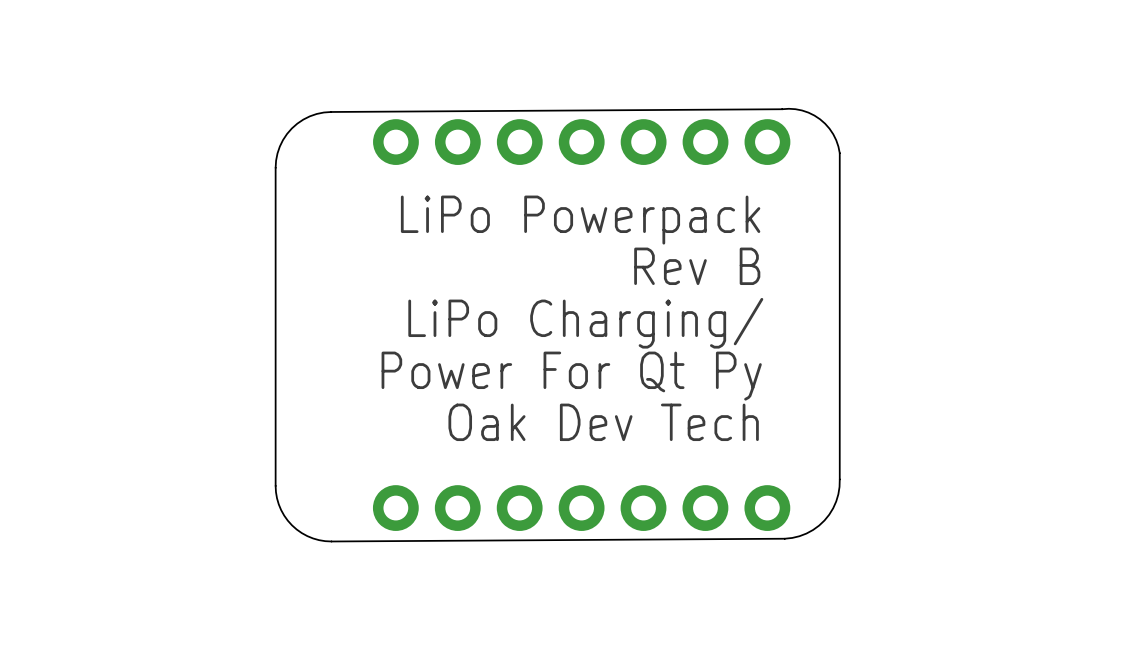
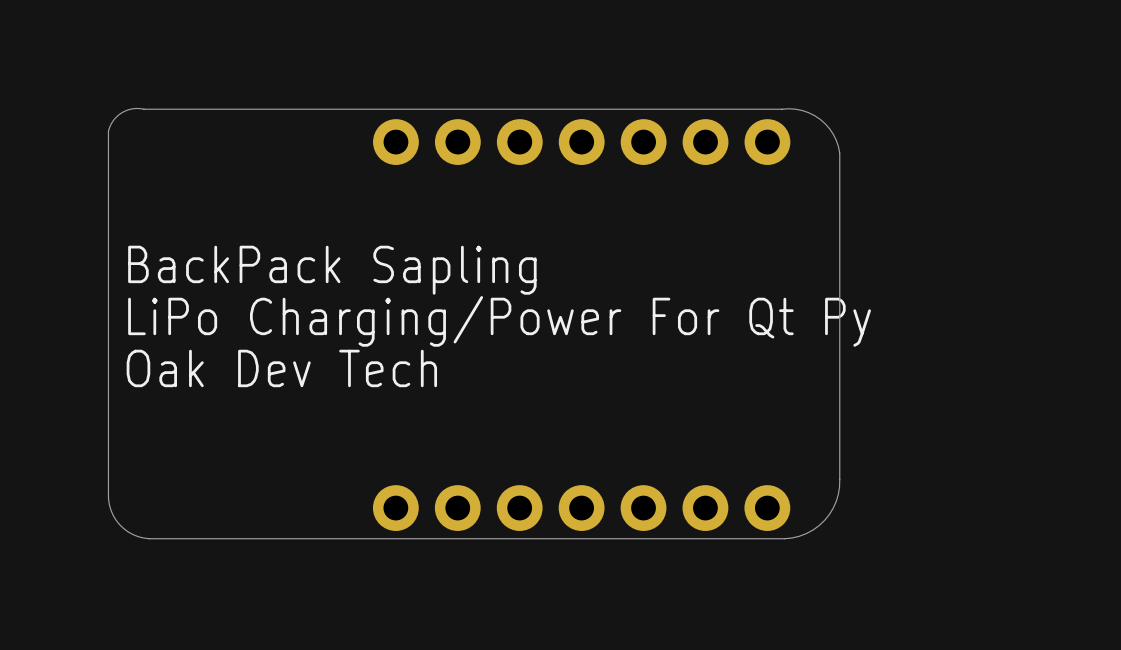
board edge: (782, 109) (331, 111) (316, 113) (297, 123) (287, 133) (279, 146) (275, 167) (275, 485) (278, 504) (287, 520) (307, 536) (325, 541) (784, 538) -> (782, 109) (136, 108) (121, 112) (113, 120) (108, 131) (108, 493) (110, 510) (119, 524) (133, 534) (149, 538) (784, 538)
text: LiPo Powerpack (580, 220) -> none
text: Rev B (697, 266) -> none
text: none -> BackPack Sapling (332, 270)
text: none -> LiPo Charging/Power For Qt Py (499, 321)
text: LiPo Charging/ (585, 323) -> none
text: none -> Oak Dev Tech (281, 368)
text: Power For Qt Py (571, 376) -> none
text: Oak Dev Tech (603, 422) -> none

